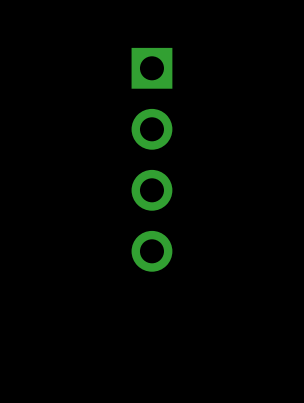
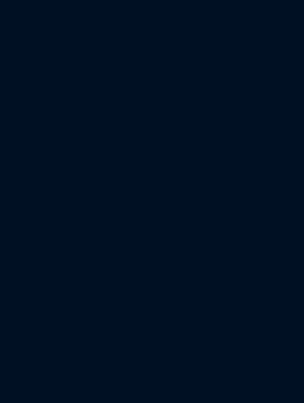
part: (151, 159) -> none

